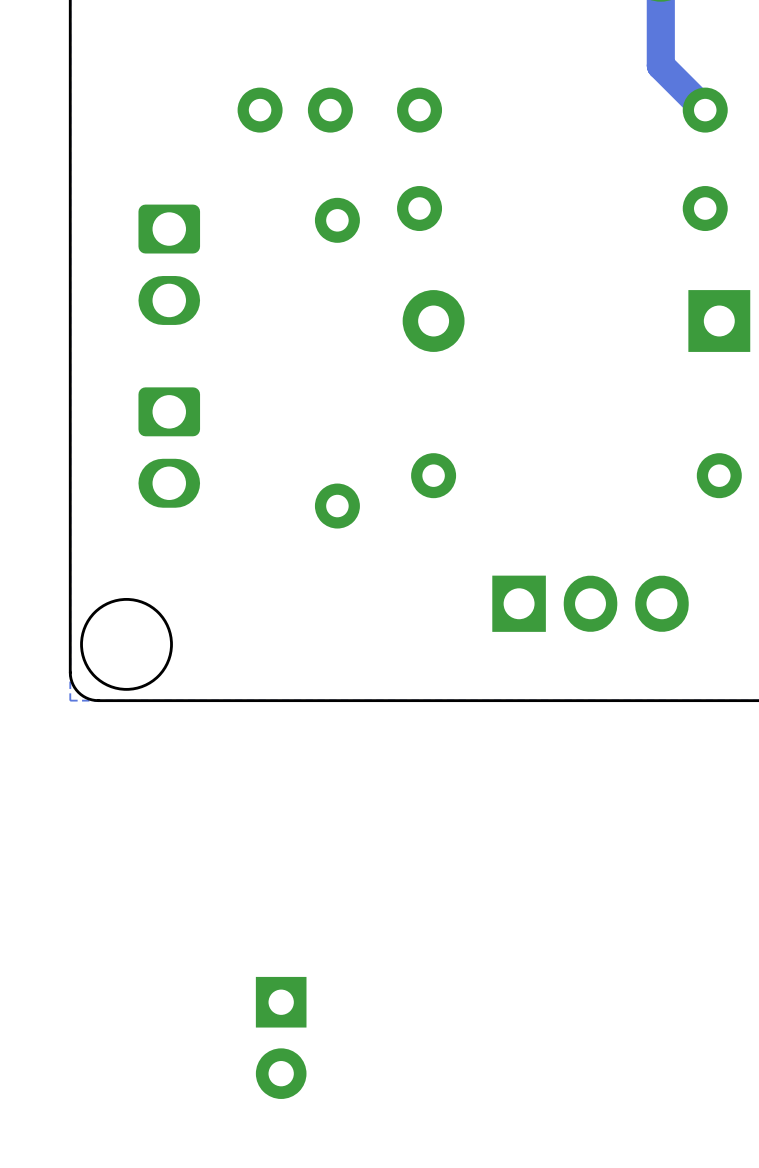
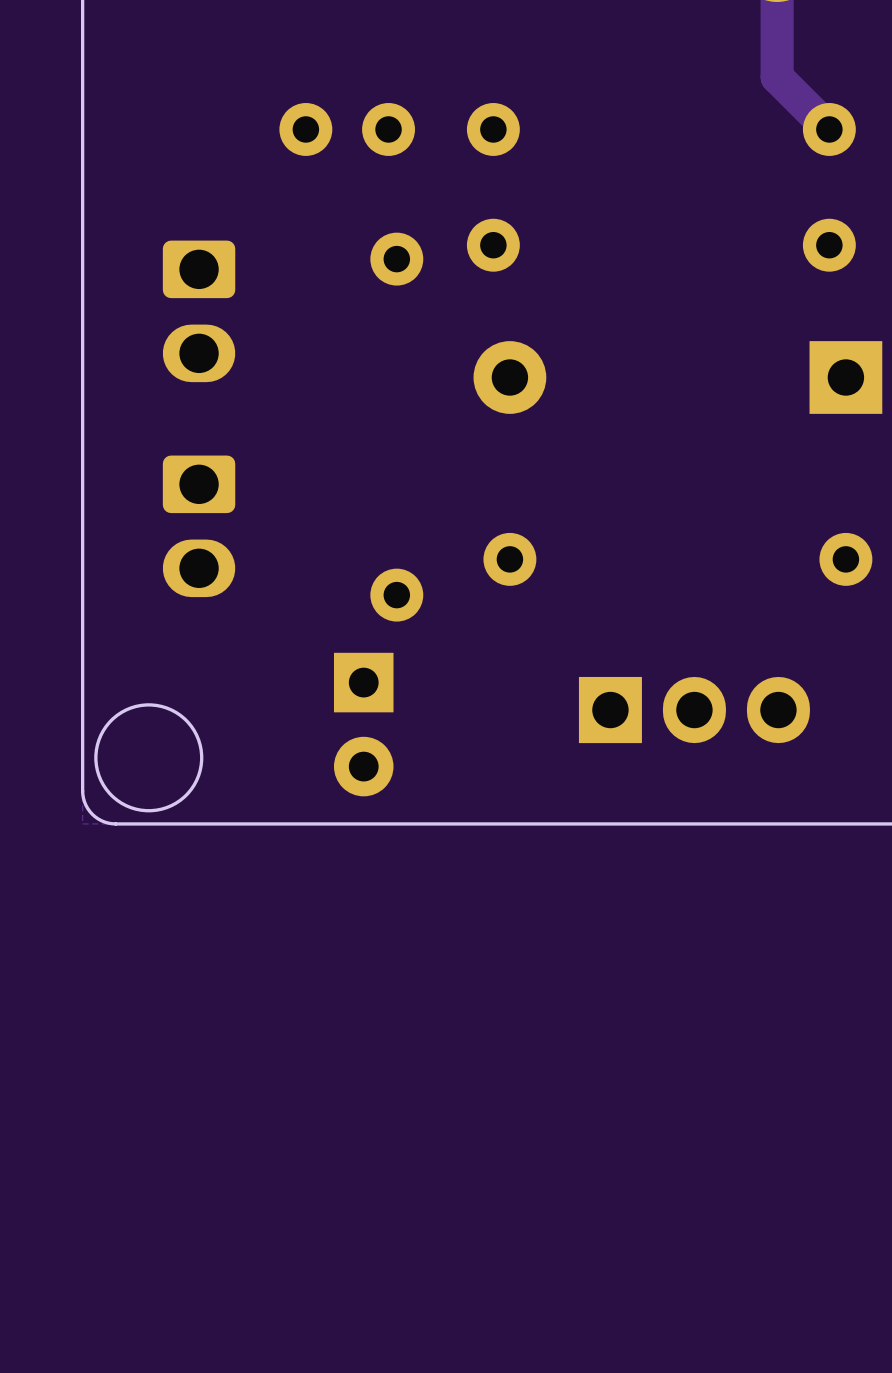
part position: (281, 1037) -> (363, 724)

